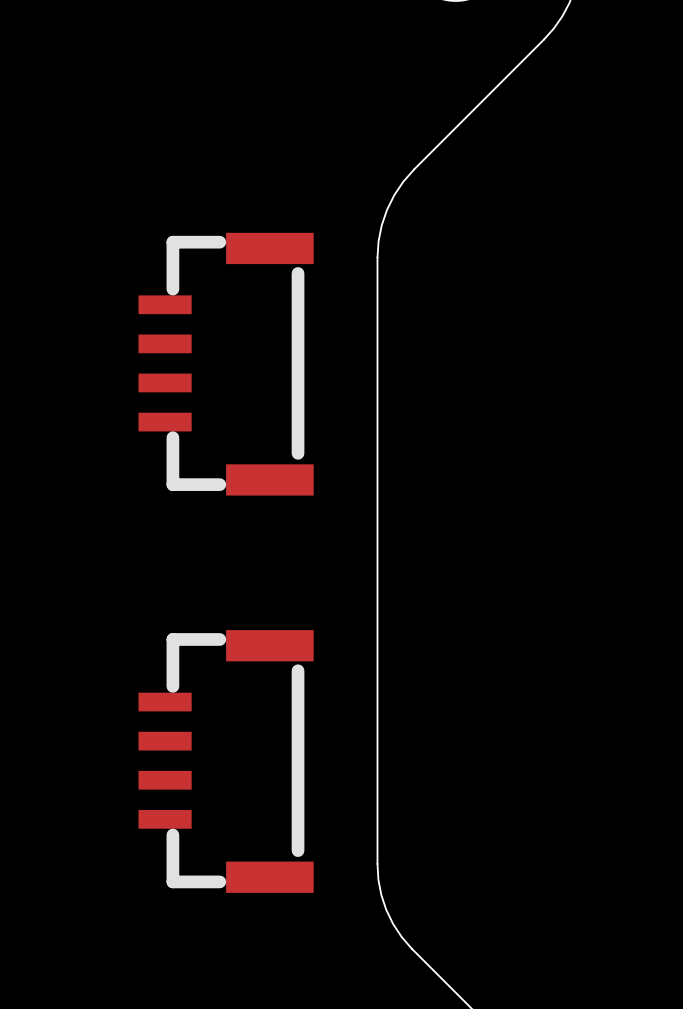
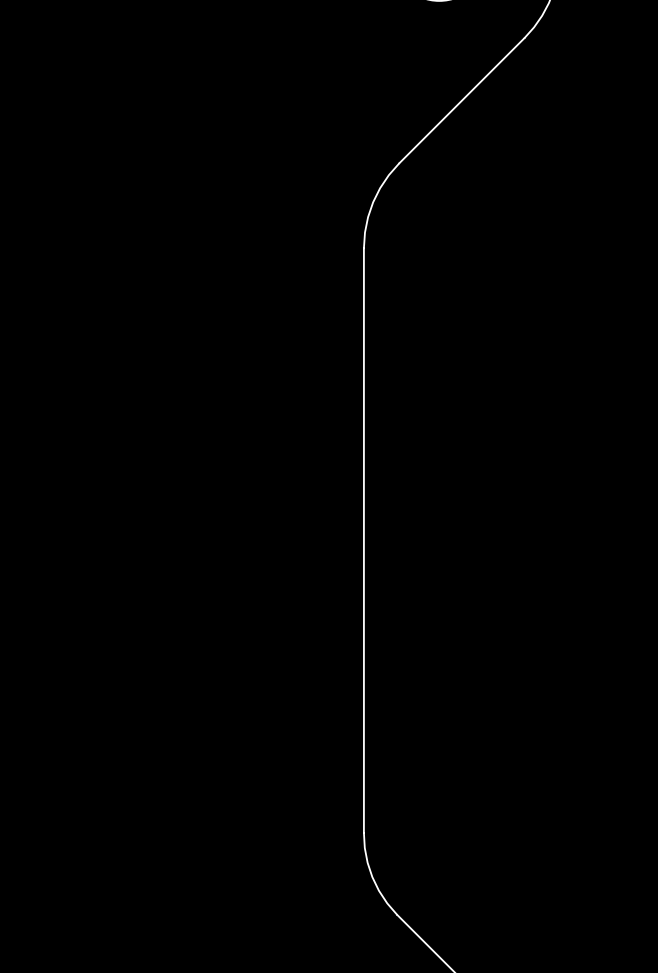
part: (226, 364) -> none
part: (226, 761) -> none

